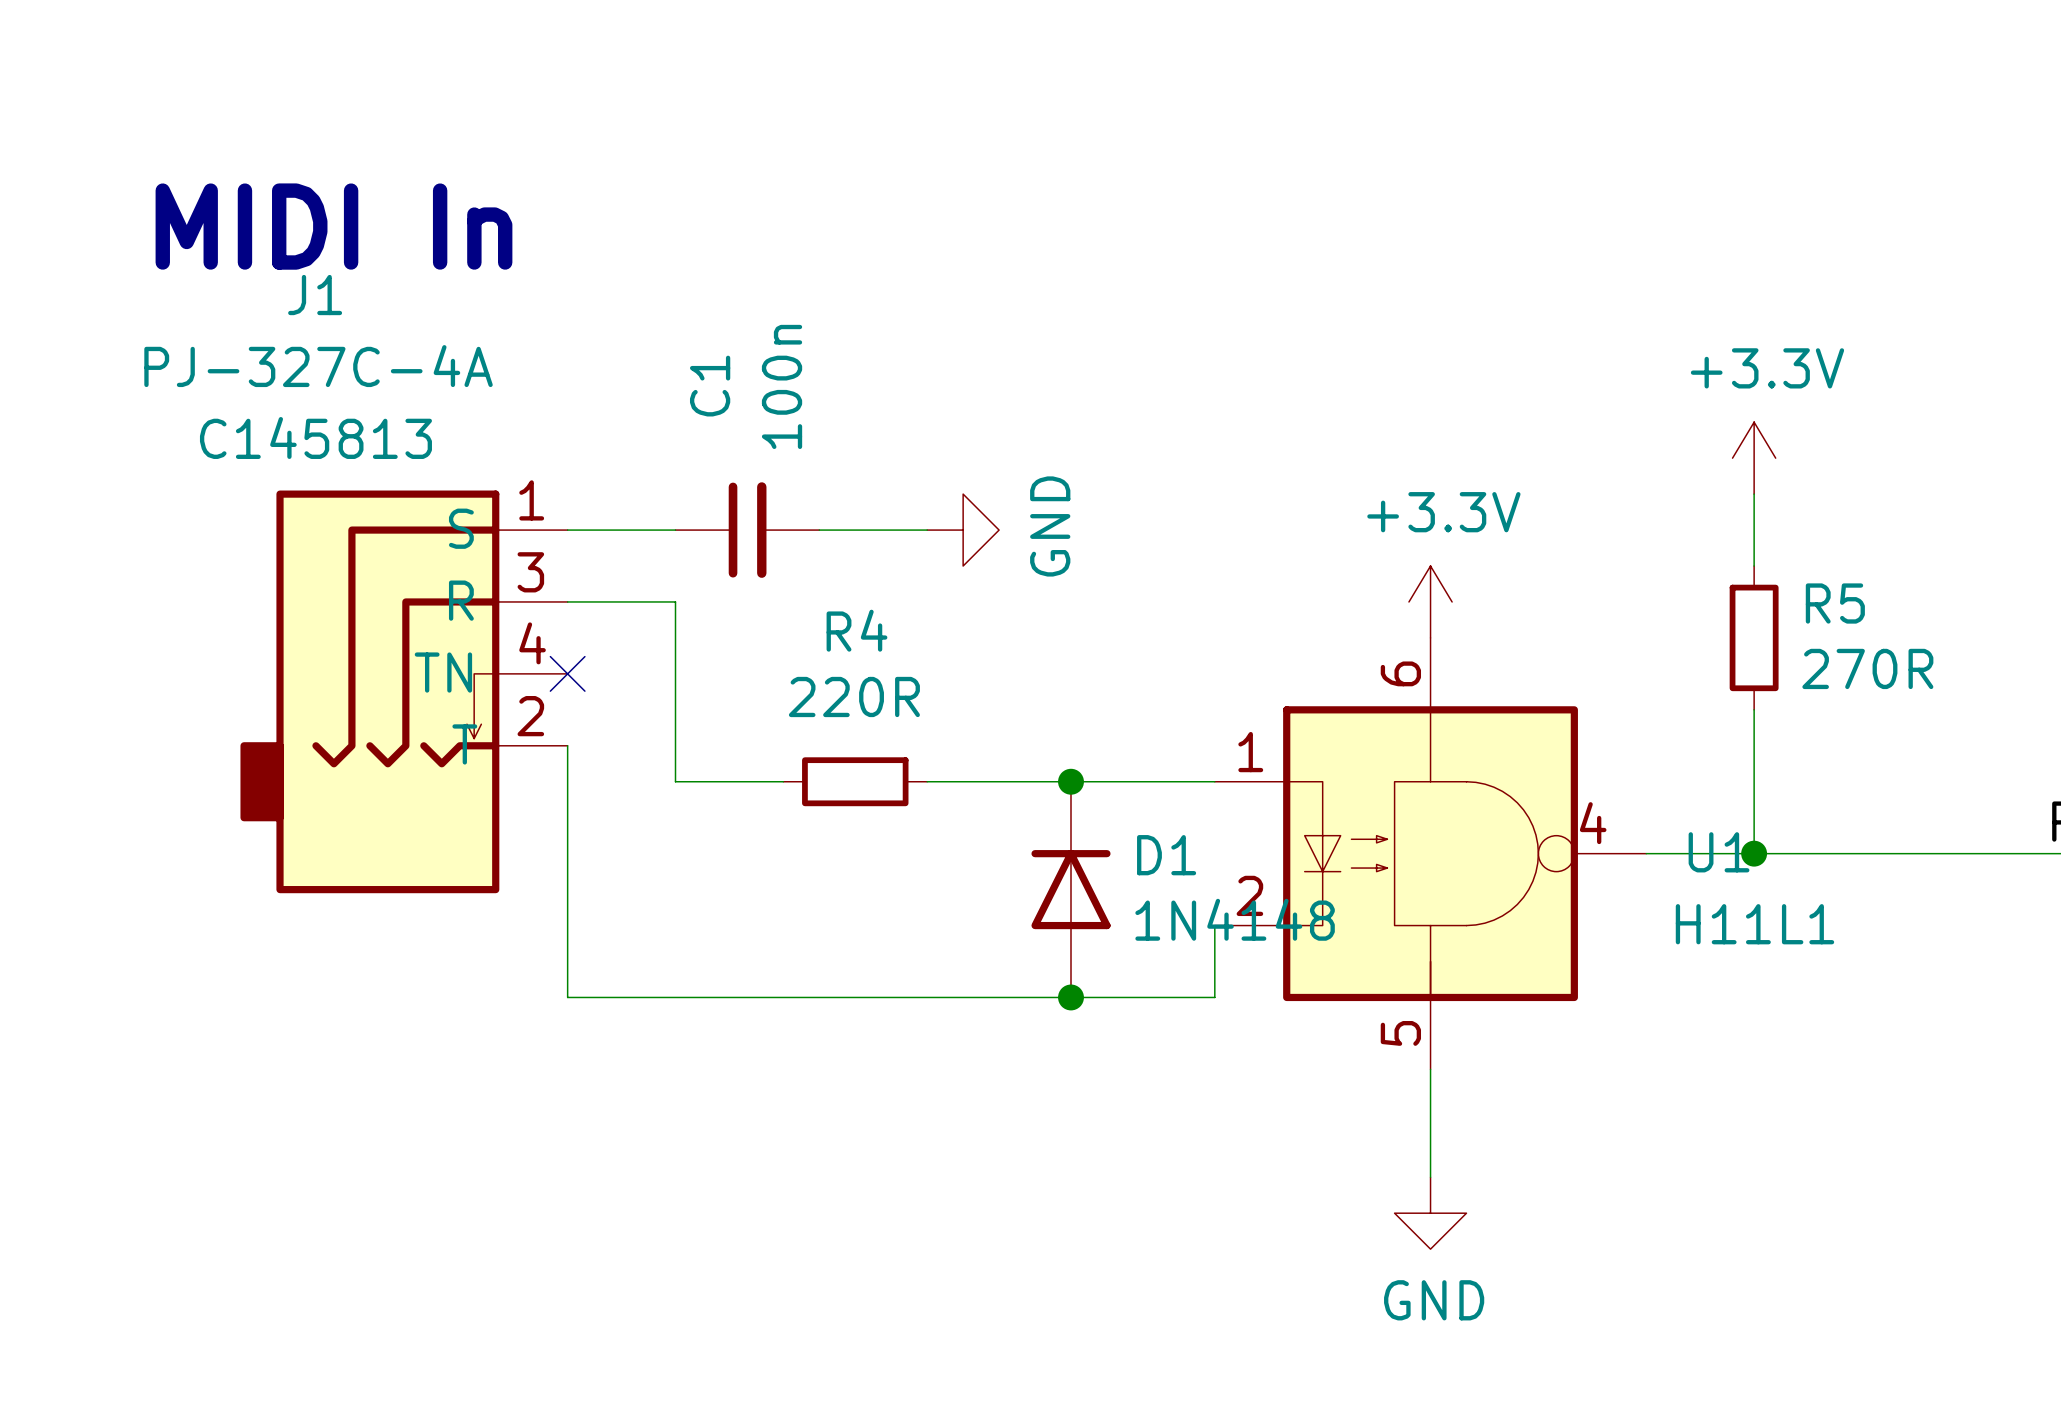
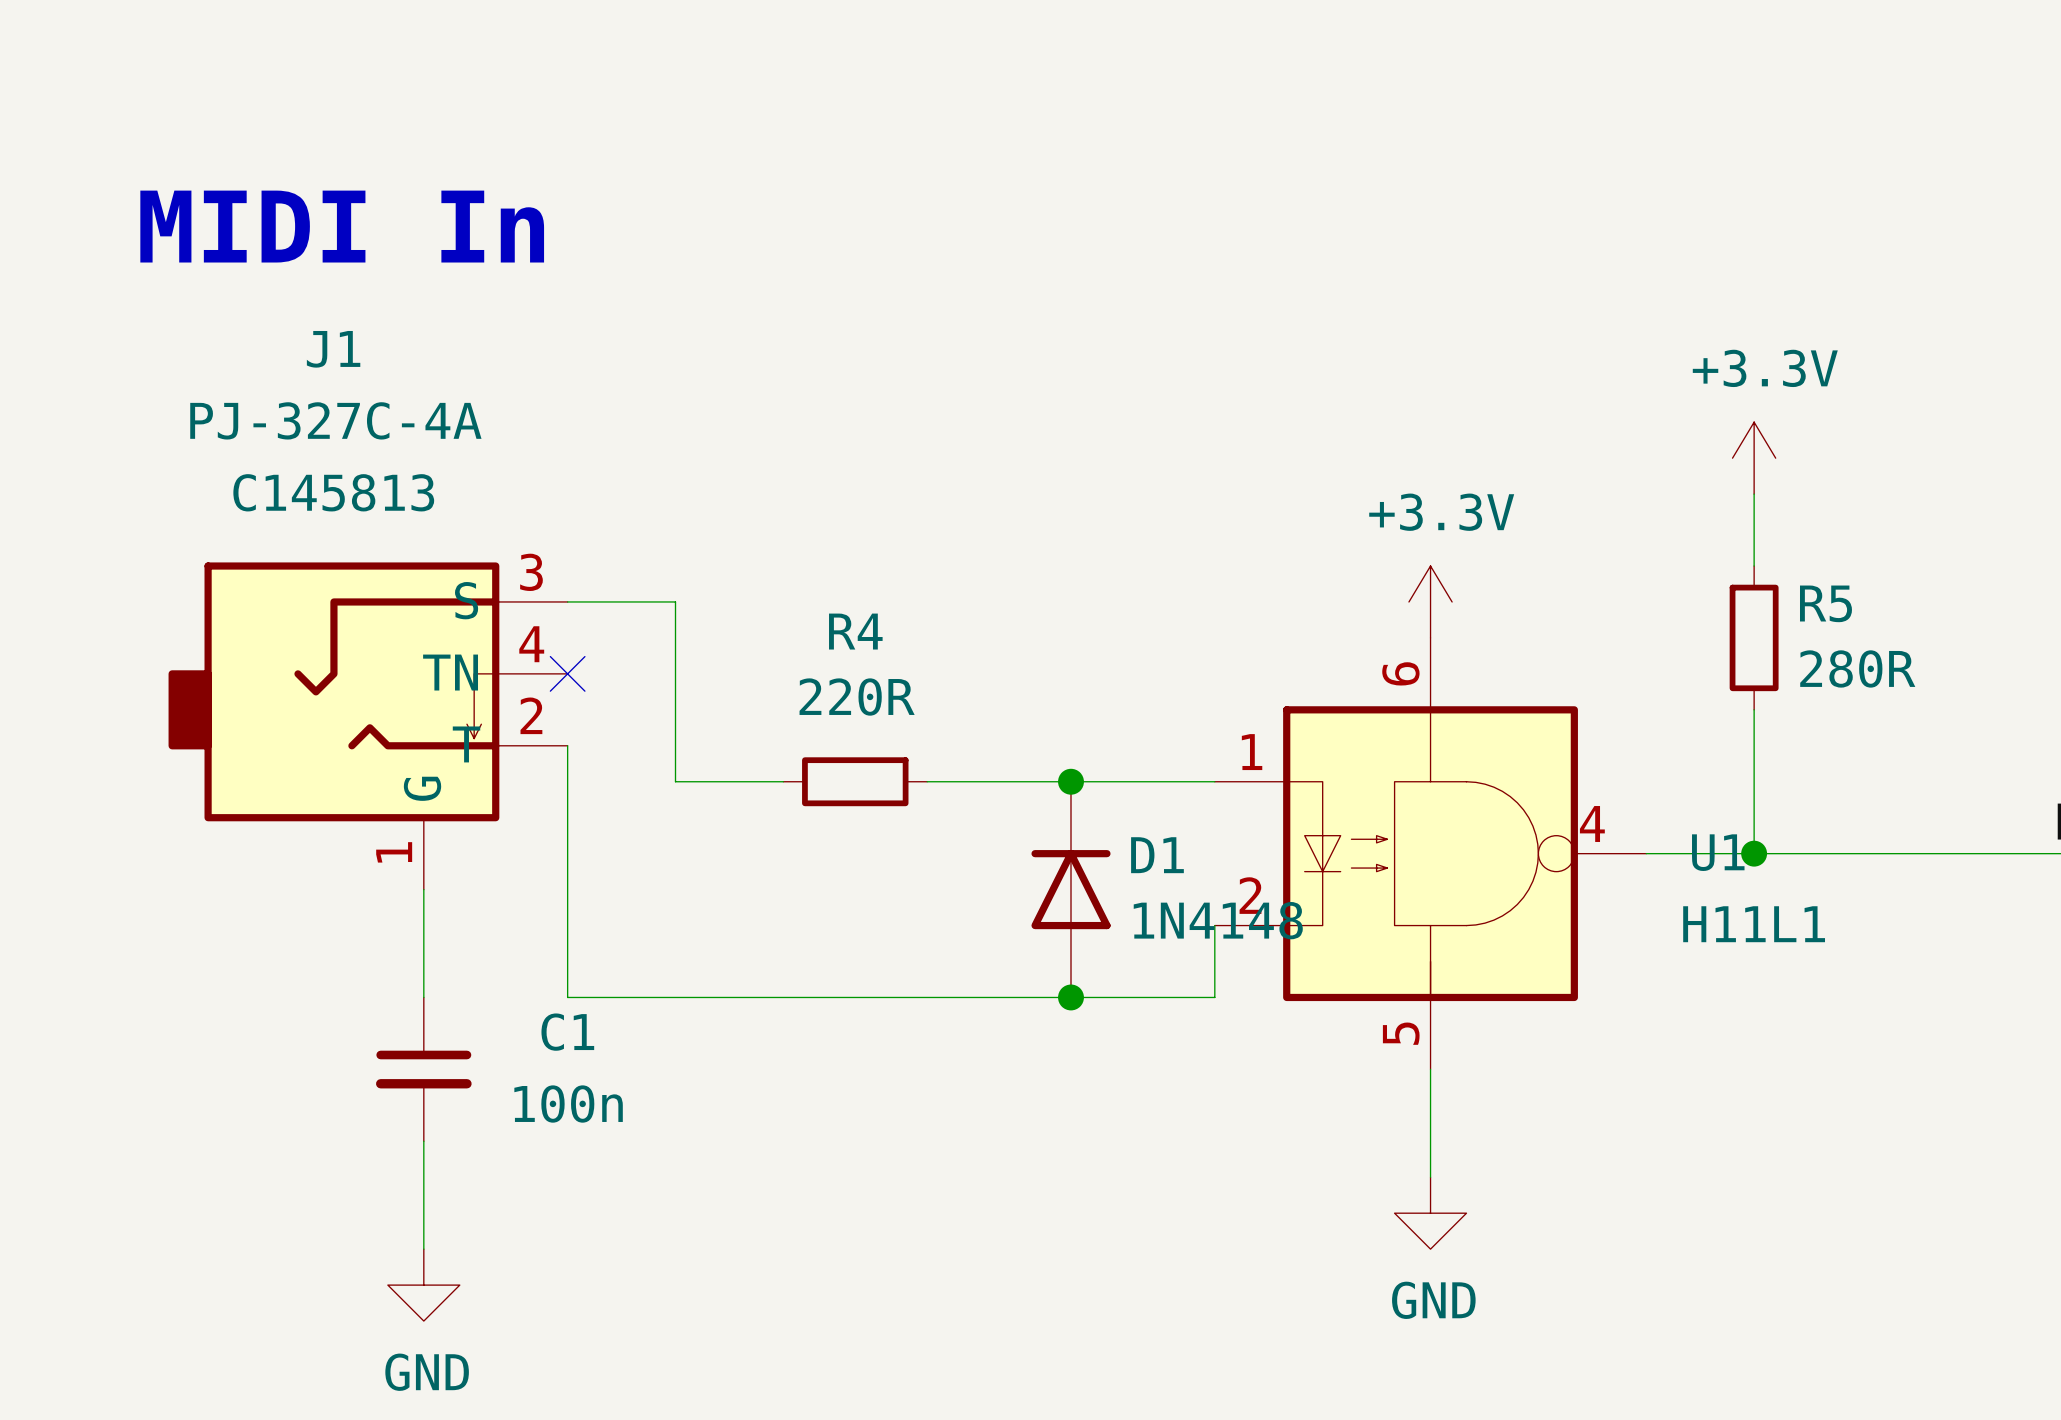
J1 name position: J1 (315, 295) -> J1 (333, 349)
J1 value position: PJ-327C-4A (318, 366) -> PJ-327C-4A (335, 420)
J1 text position: C145813 (315, 437) -> C145813 (333, 492)
J1 symbol: [240, 490, 568, 894] -> [168, 562, 568, 890]
wire: (567, 530) (675, 530) -> none
C1 rotation: 0° (747, 530) -> 90° clockwise (423, 1069)
C1 position: (747, 530) -> (423, 1069)
wire: (819, 530) (927, 530) -> none
power symbol: GND (963, 530) -> none
R5 value: 270R (1867, 668) -> 280R (1857, 668)
wire: none -> (423, 889) (423, 997)
wire: none -> (423, 1141) (423, 1249)
power symbol: none -> GND (423, 1285)

